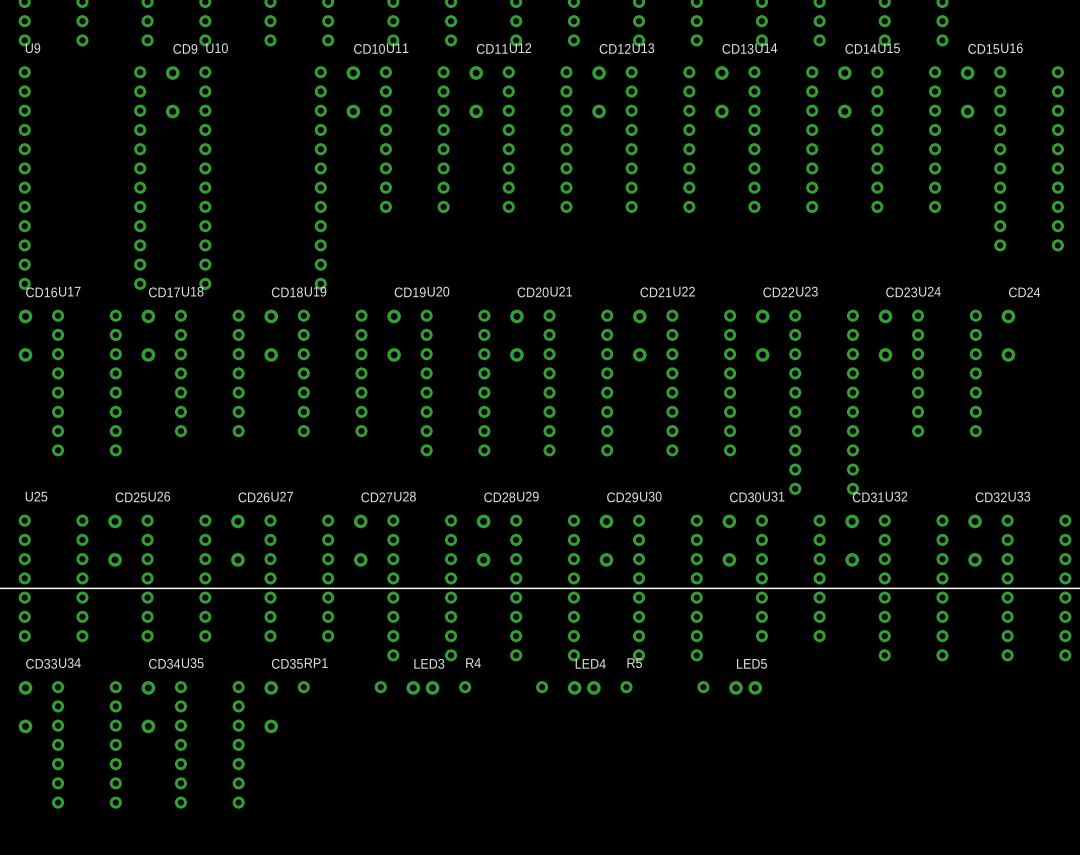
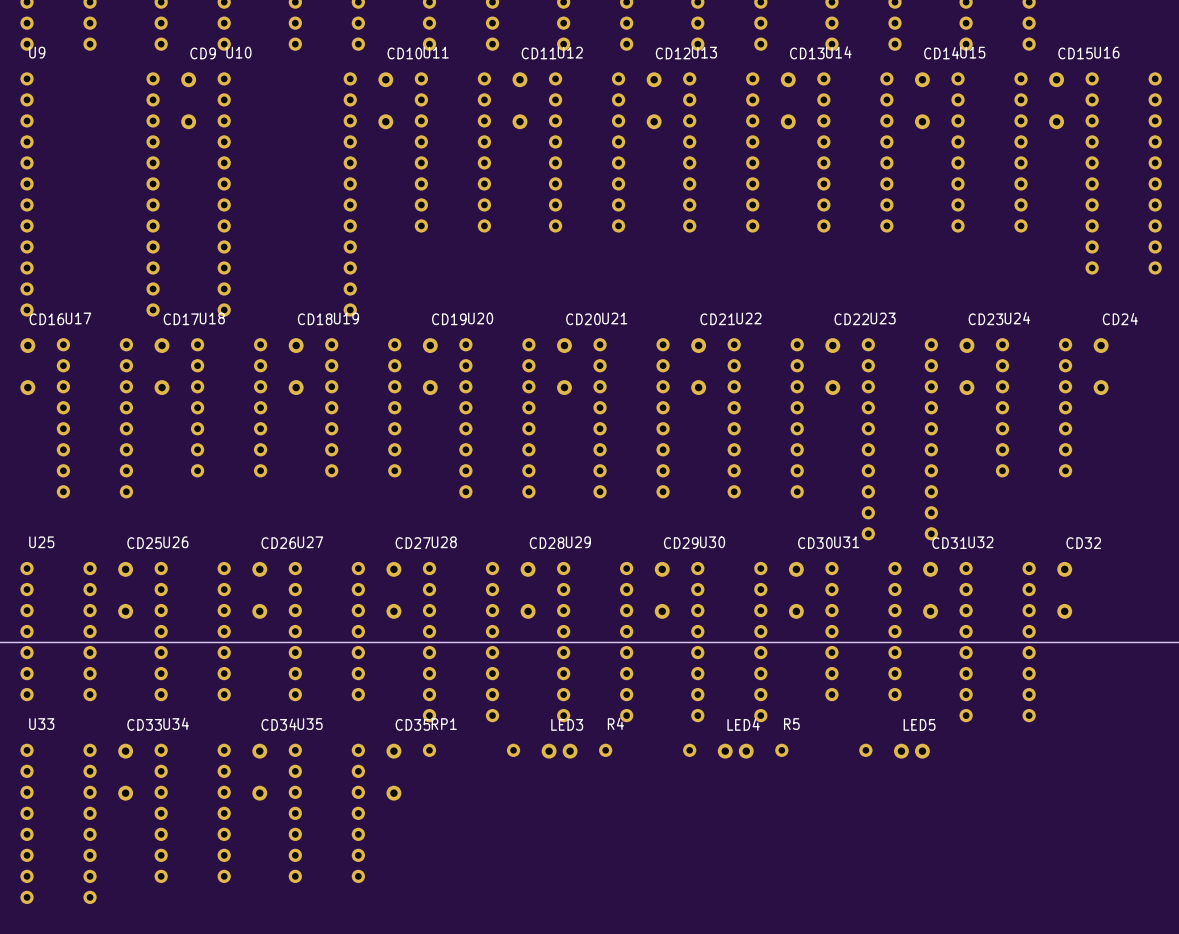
U33 position: (1036, 588) -> (58, 823)
RP1 position: (342, 687) -> (471, 750)
LED3 position: (422, 687) -> (559, 751)
R4 position: (503, 687) -> (647, 750)
LED4 position: (584, 687) -> (735, 751)
R5 position: (664, 687) -> (823, 750)
LED5 position: (745, 687) -> (911, 751)
CD33 position: (25, 707) -> (125, 772)
CD34 position: (148, 707) -> (259, 772)
CD35 position: (271, 707) -> (393, 772)
U34 position: (86, 744) -> (192, 813)
U35 position: (209, 744) -> (326, 813)

